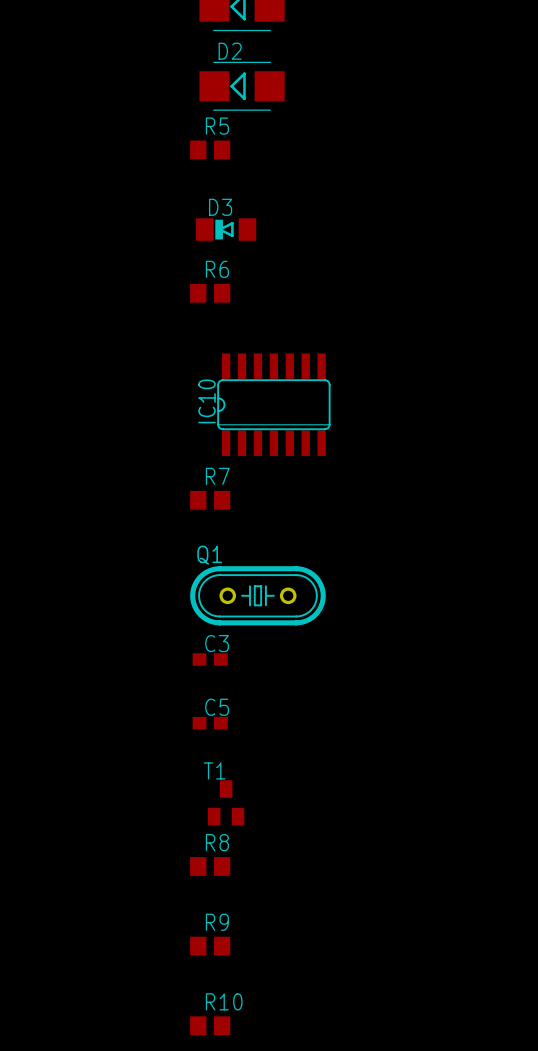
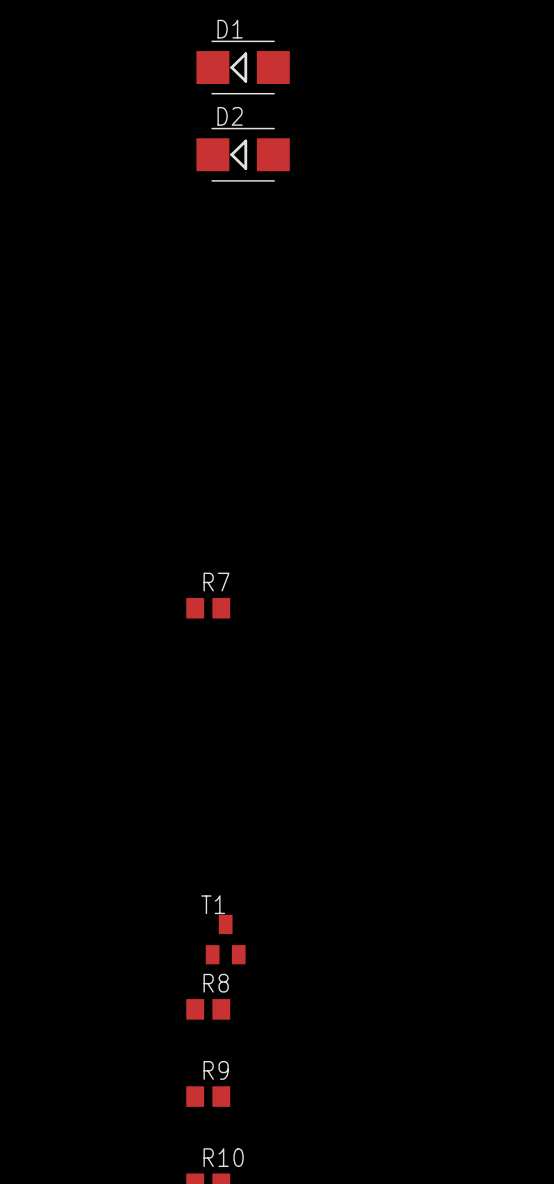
R5: (210, 149) -> none
D3: (226, 229) -> none
R6: (210, 293) -> none
IC10: (273, 404) -> none
Q1: (257, 595) -> none
C3: (210, 659) -> none
C5: (210, 723) -> none

